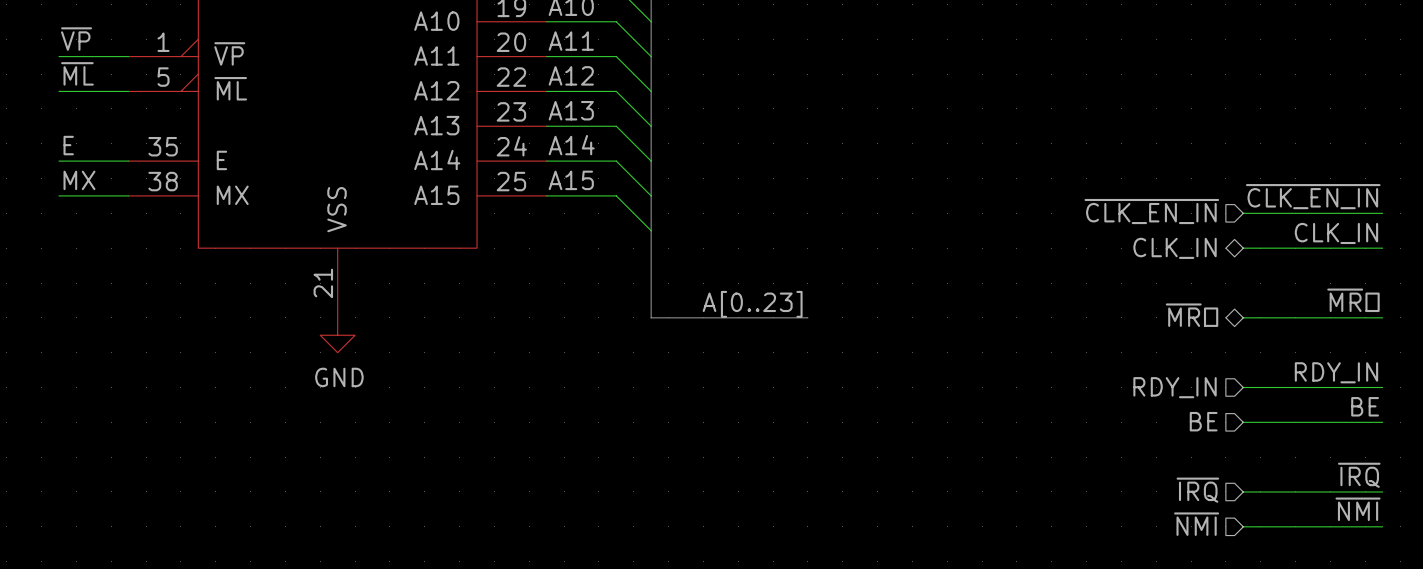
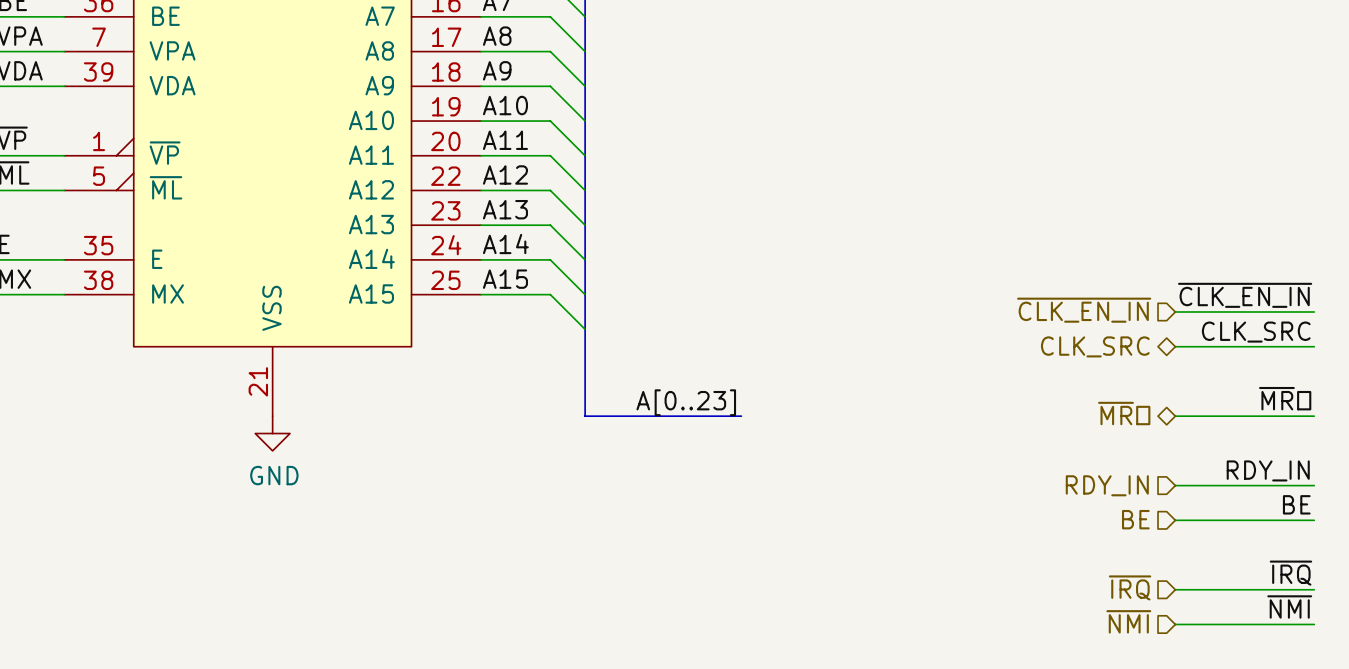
label: CLK_IN (1336, 233) -> CLK_SRC (1256, 332)
hierarchical label: CLK_IN (1175, 248) -> CLK_SRC (1095, 346)

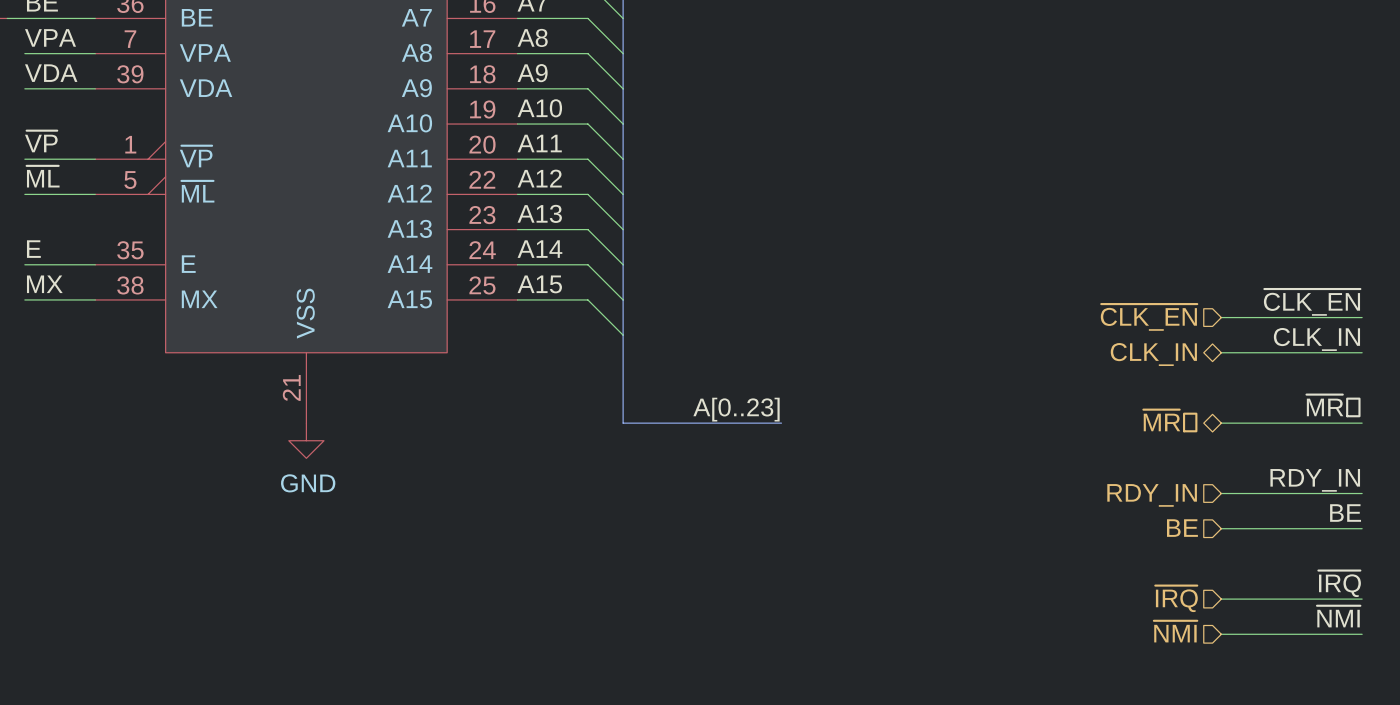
label: ~{CLK_EN_IN} (1245, 295) -> ~{CLK_EN} (1312, 302)
hierarchical label: ~{CLK_EN_IN} (1084, 310) -> ~{CLK_EN} (1149, 317)
label: CLK_SRC (1256, 332) -> CLK_IN (1316, 339)
hierarchical label: CLK_SRC (1095, 346) -> CLK_IN (1153, 354)

